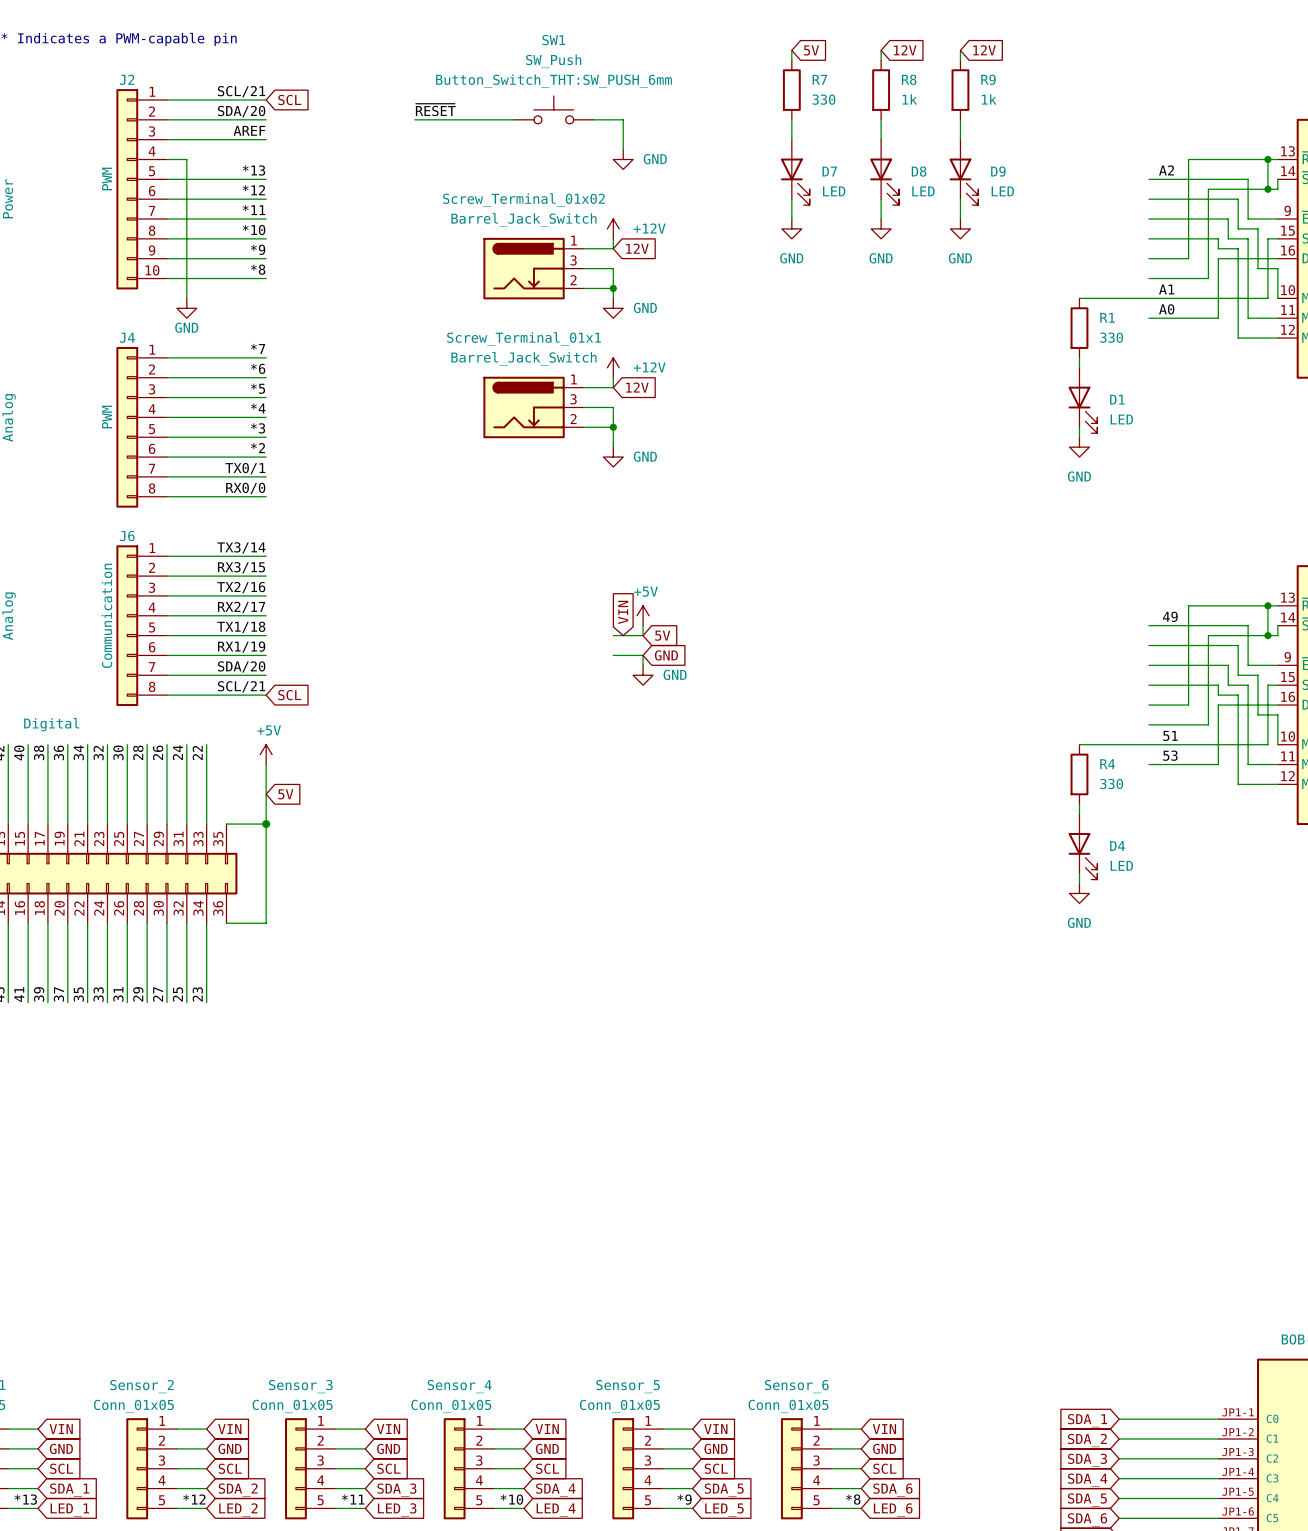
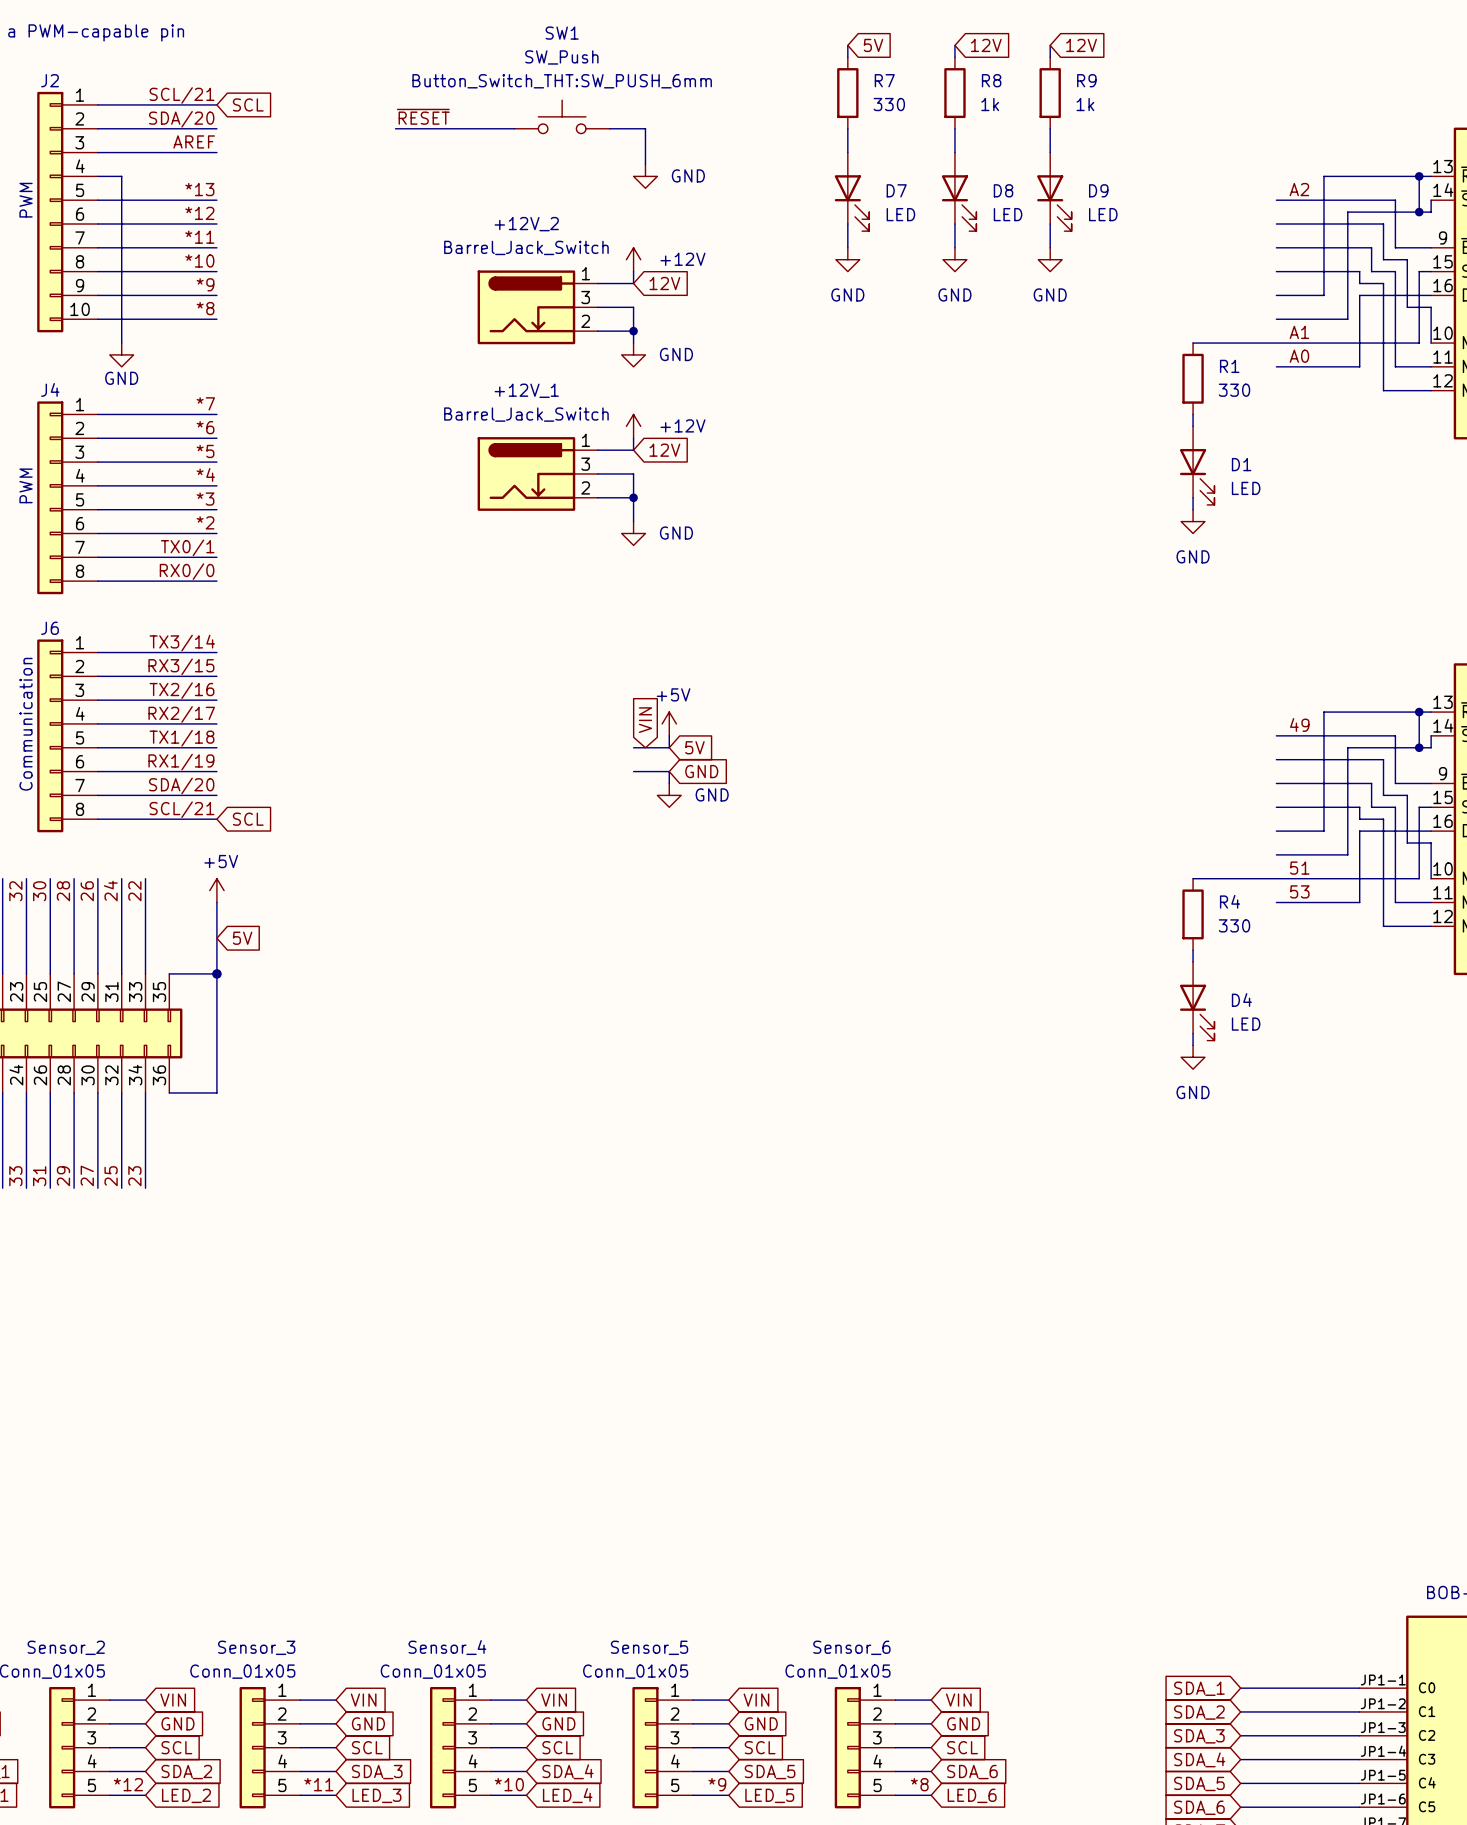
Screw_Terminal_01x02 name: Screw_Terminal_01x02 (523, 200) -> +12V_2 (526, 224)
Screw_Terminal_01x1 name: Screw_Terminal_01x1 (524, 339) -> +12V_1 (526, 390)

